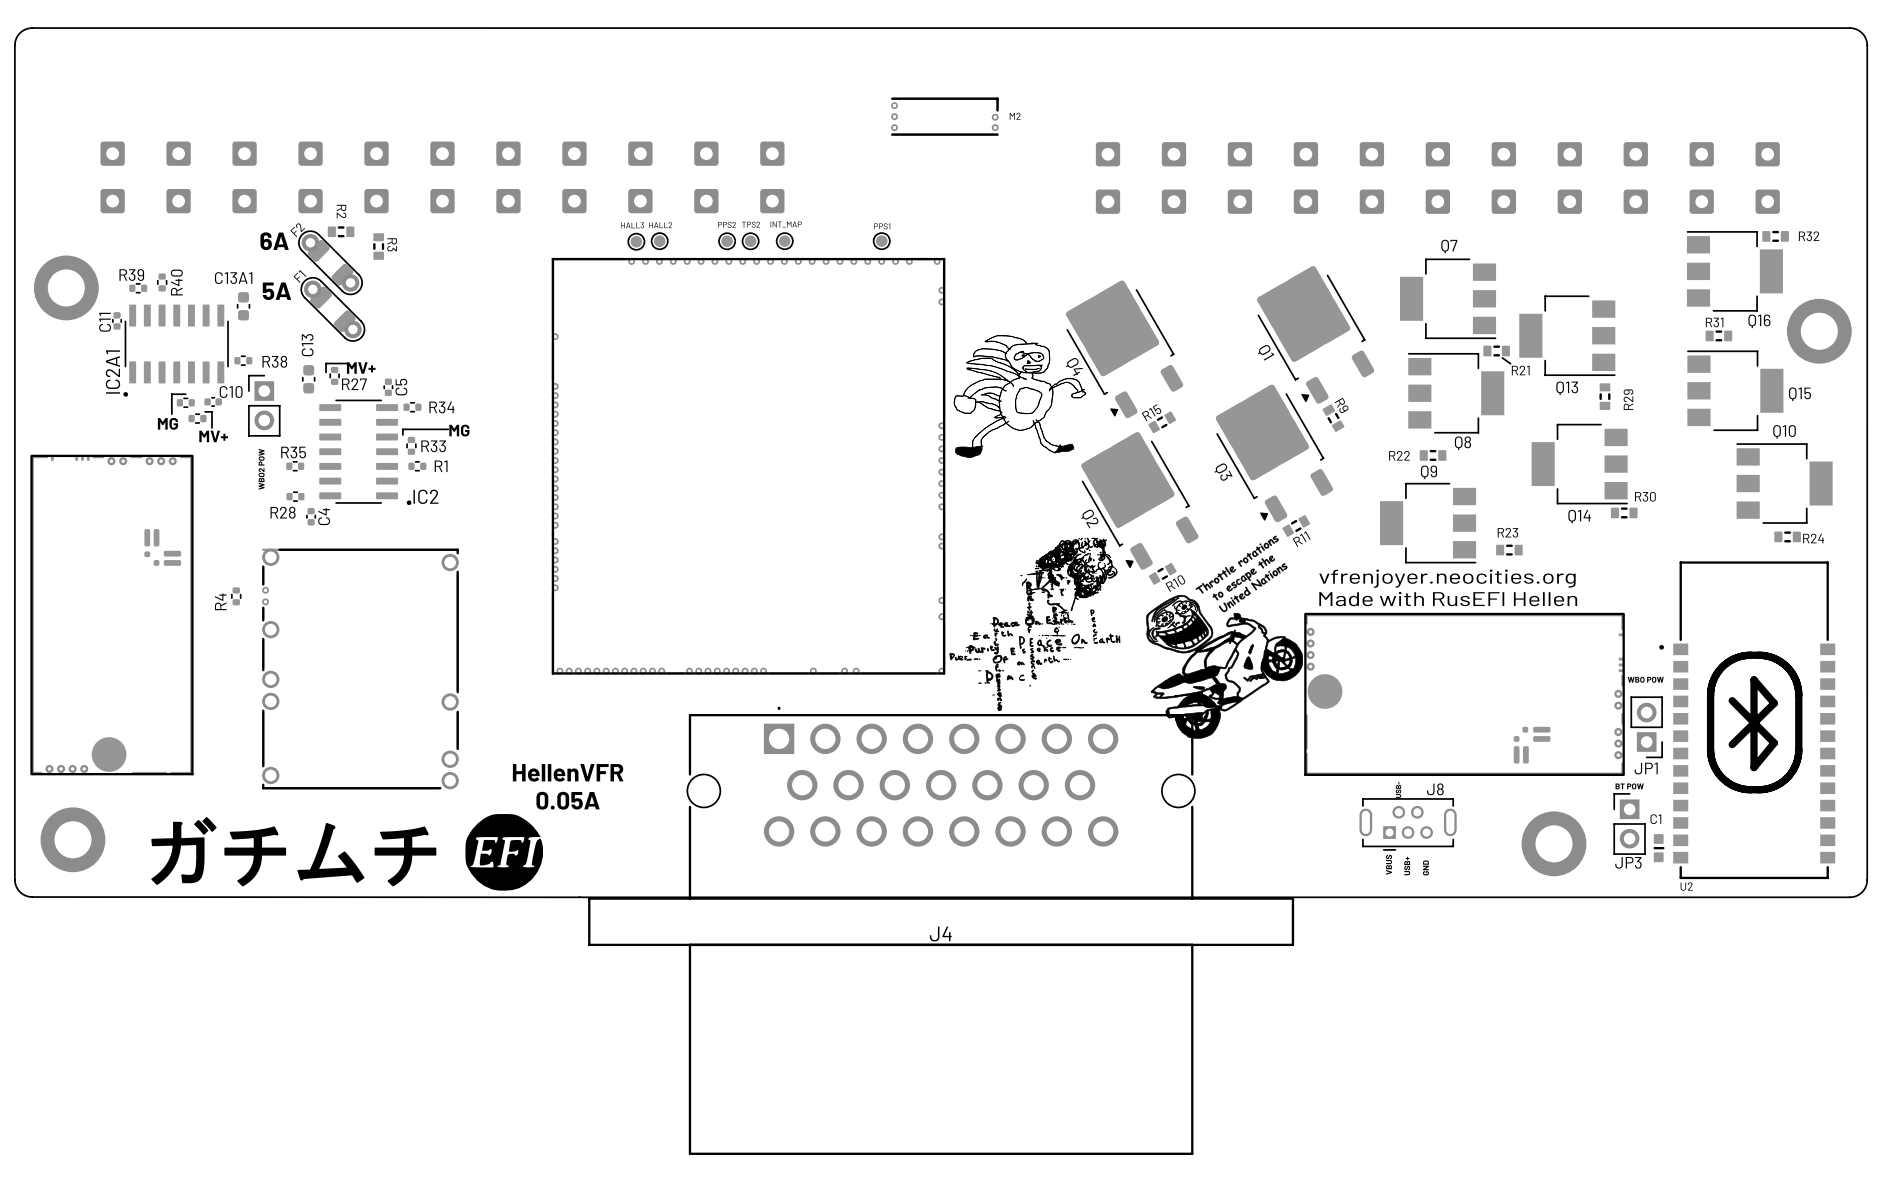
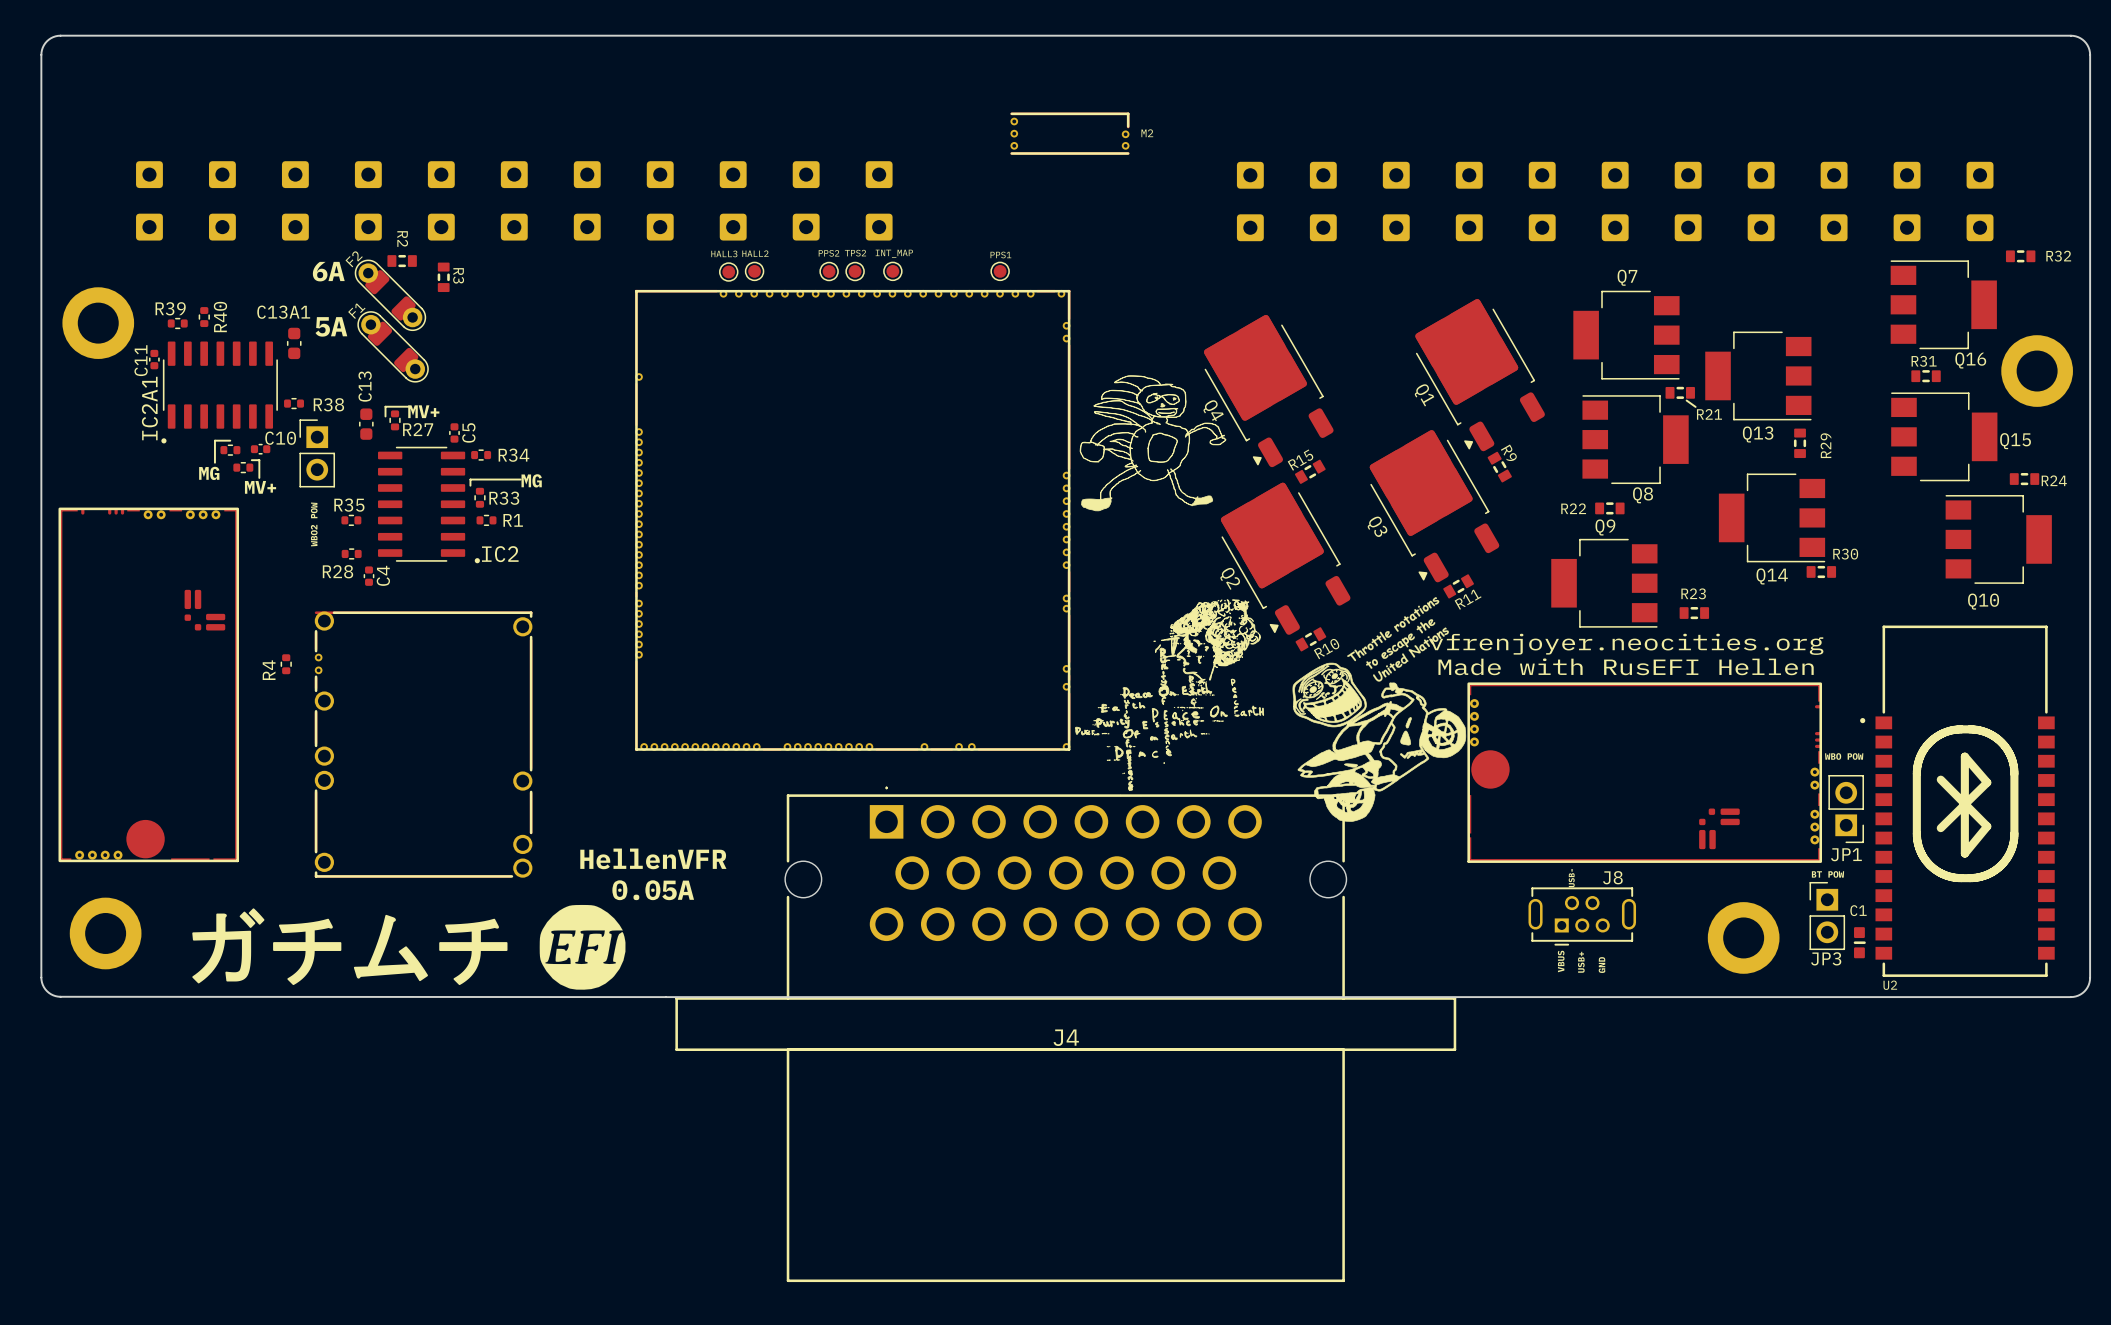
R32 position: (1775, 236) -> (2020, 256)
Q10 name position: Q10 (1784, 431) -> Q10 (1983, 601)
R24 position: (1787, 536) -> (2024, 479)

